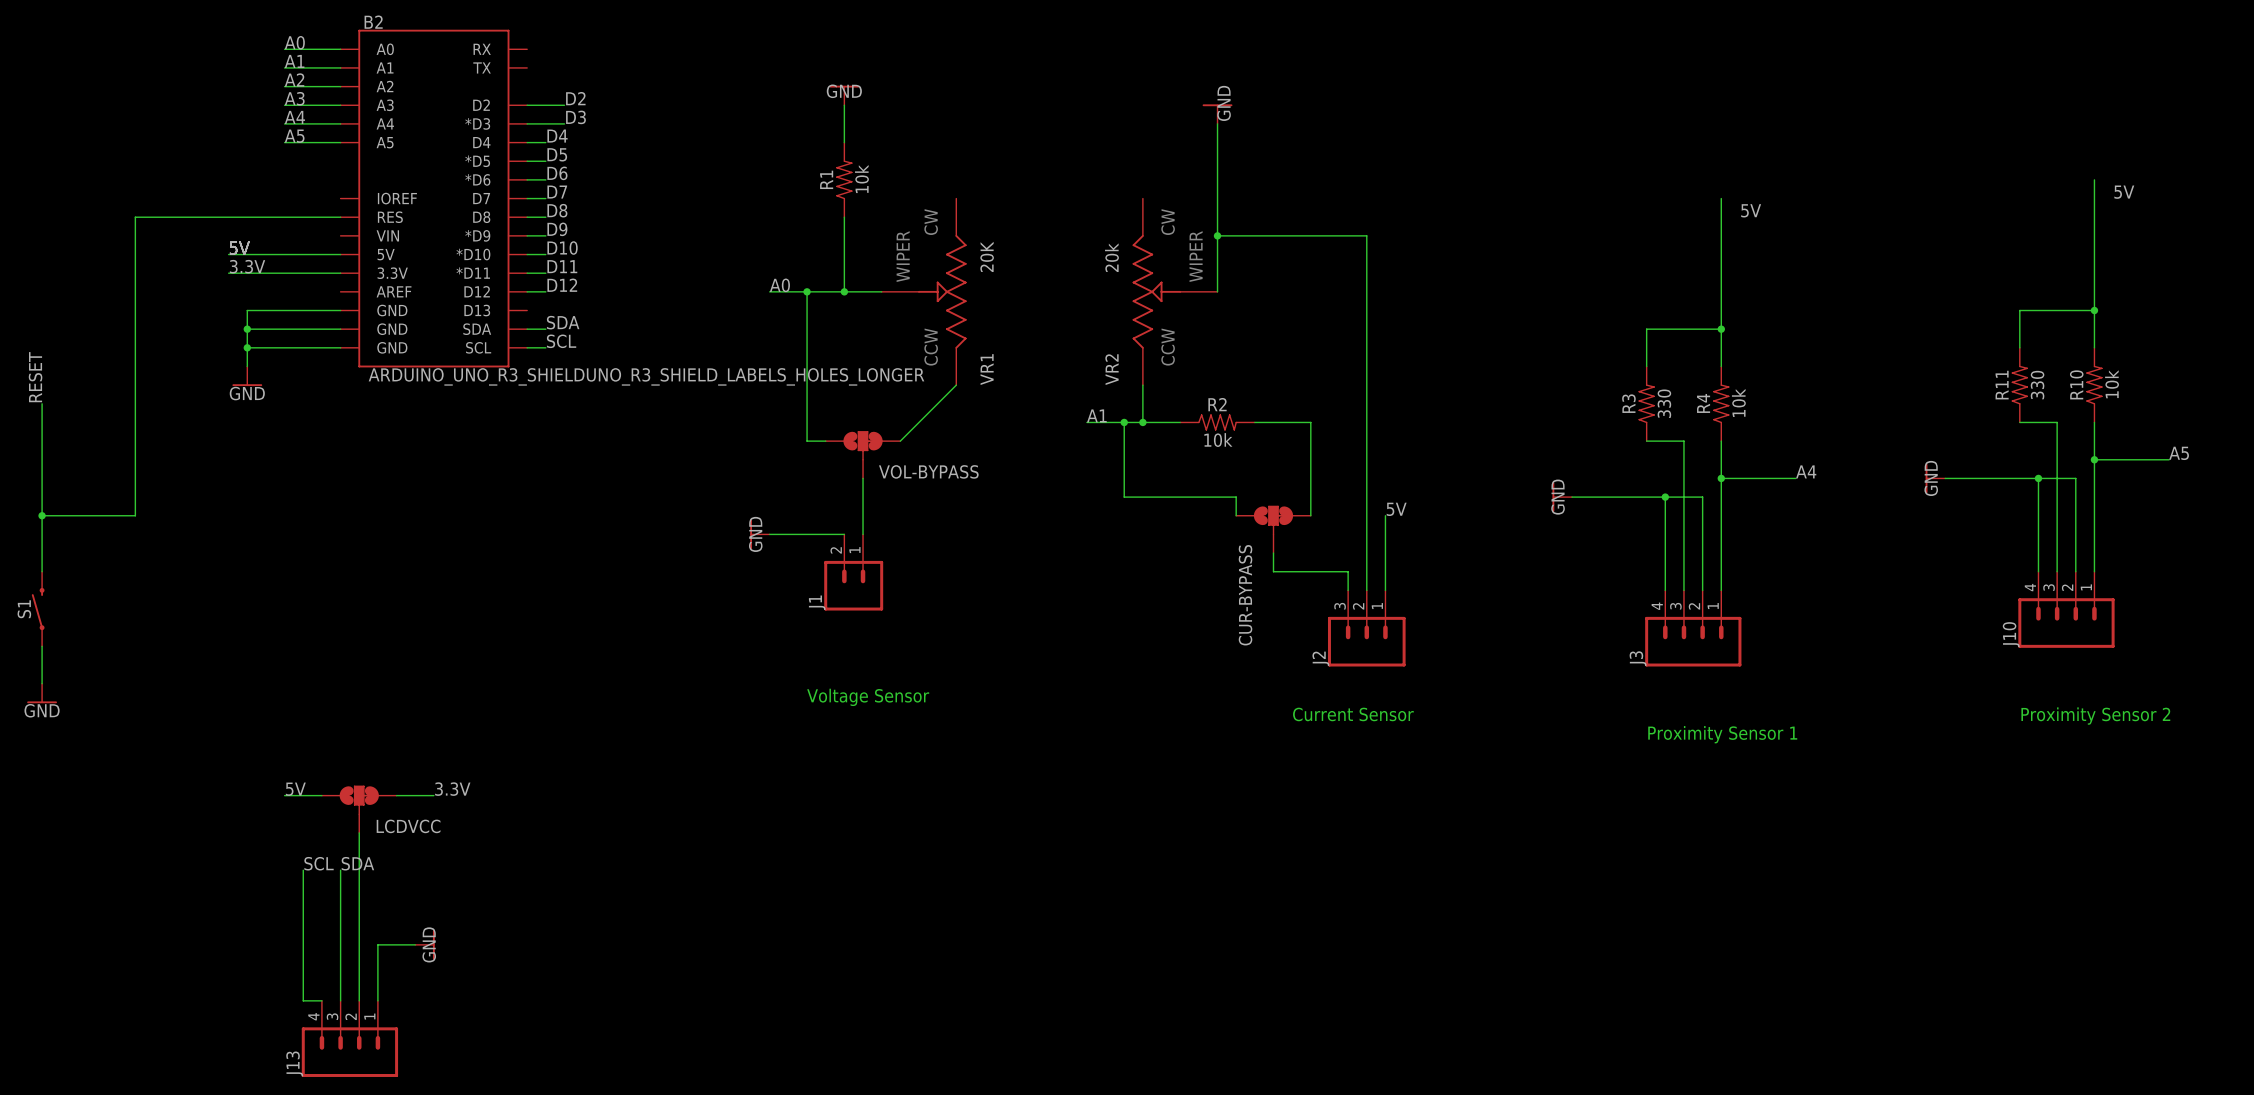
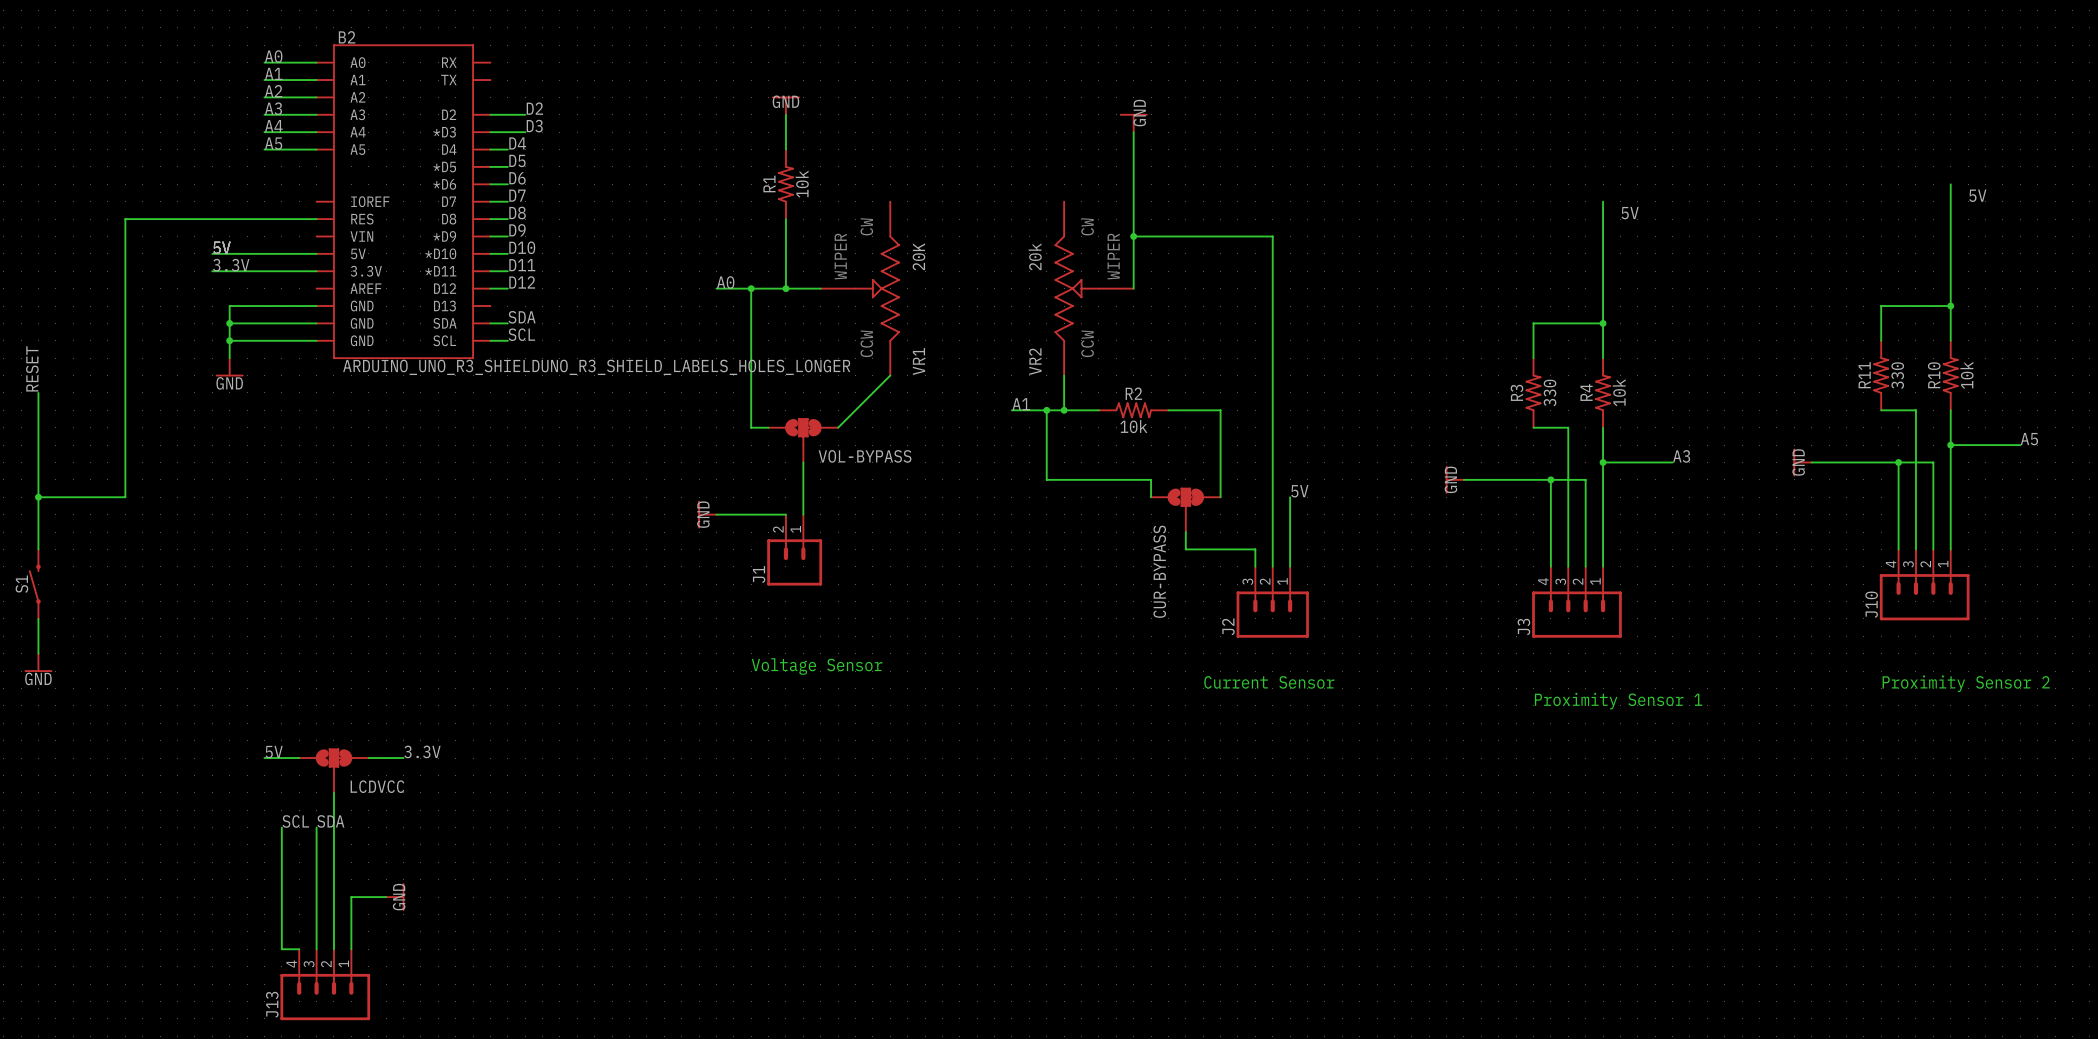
label: A4 (1806, 471) -> A3 (1681, 456)

